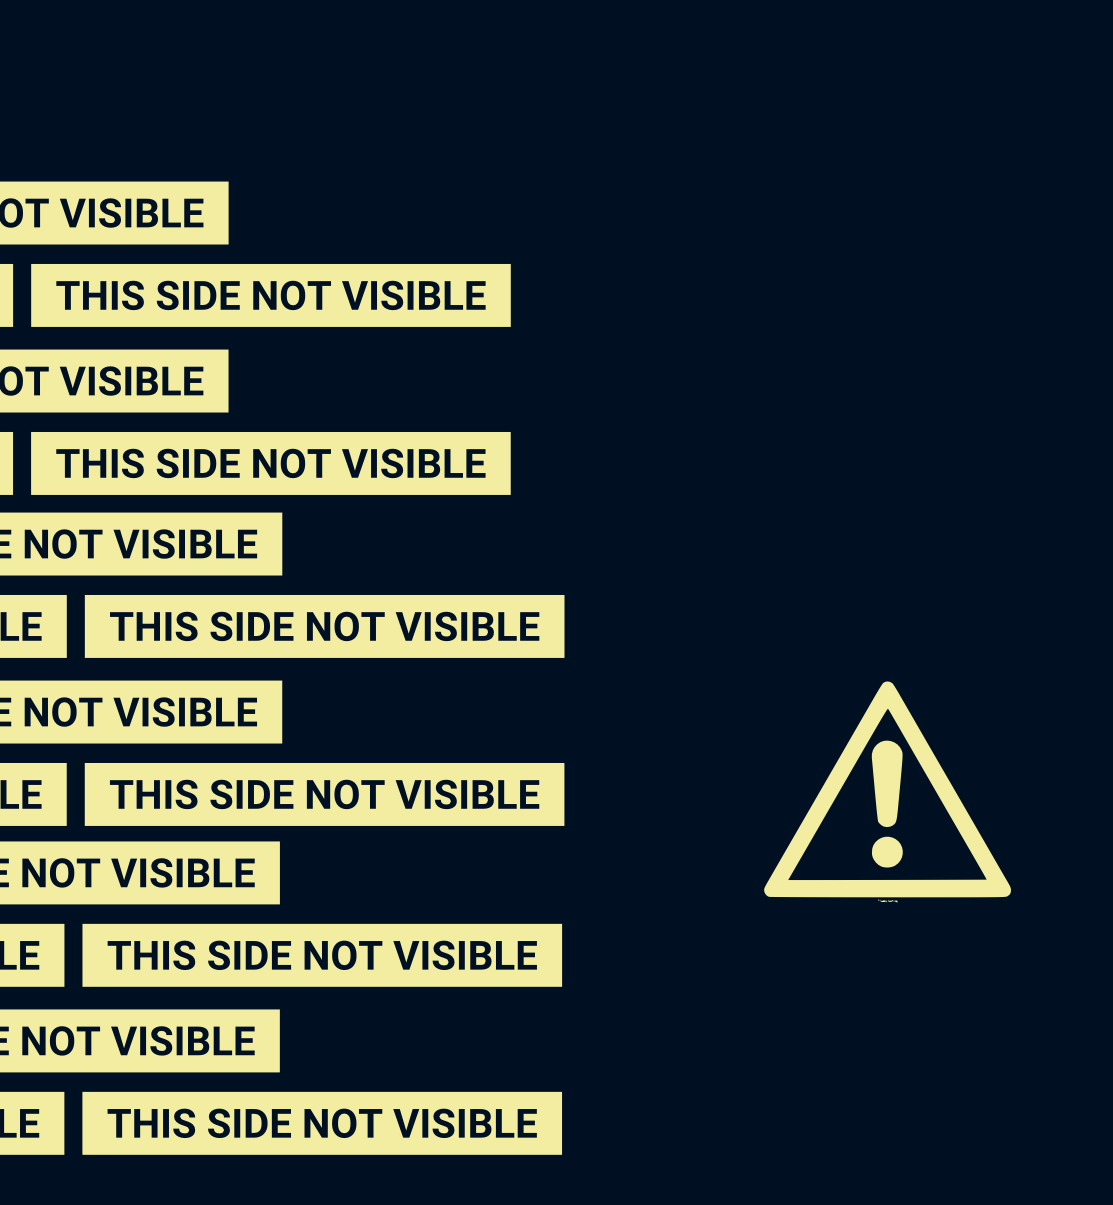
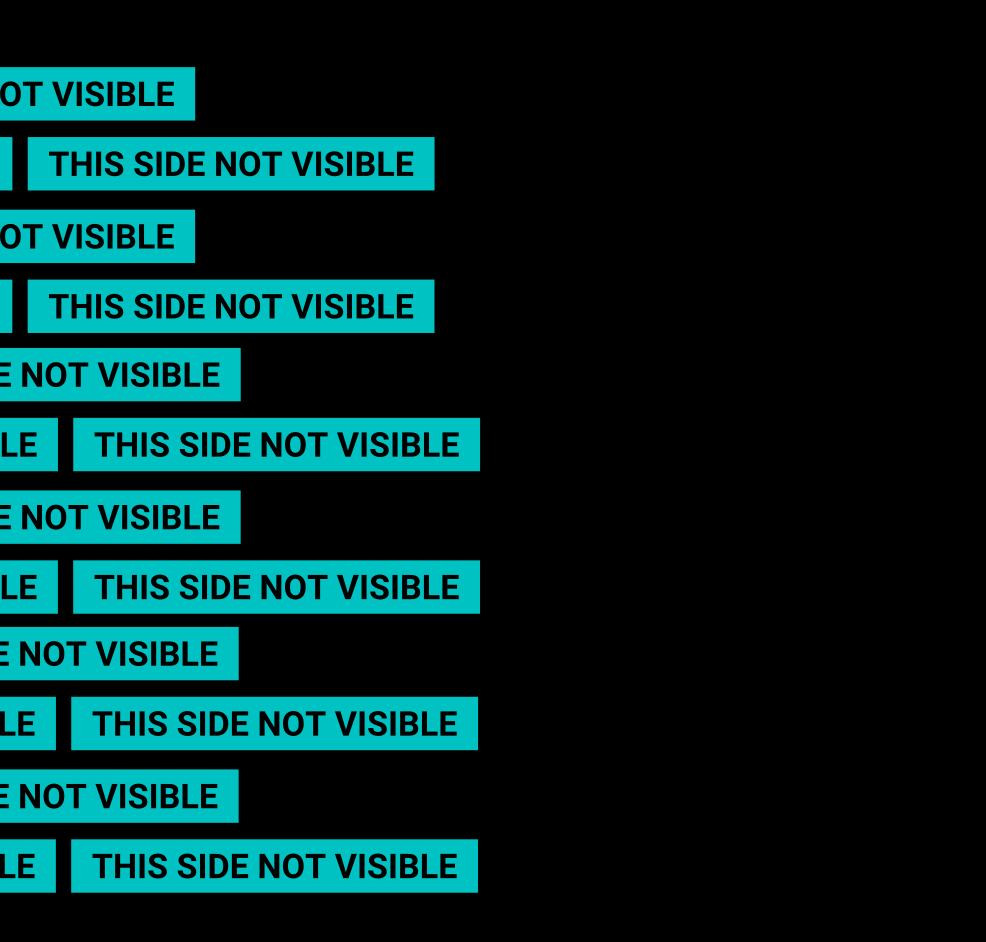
drawing: [764, 681, 1012, 903] -> none

